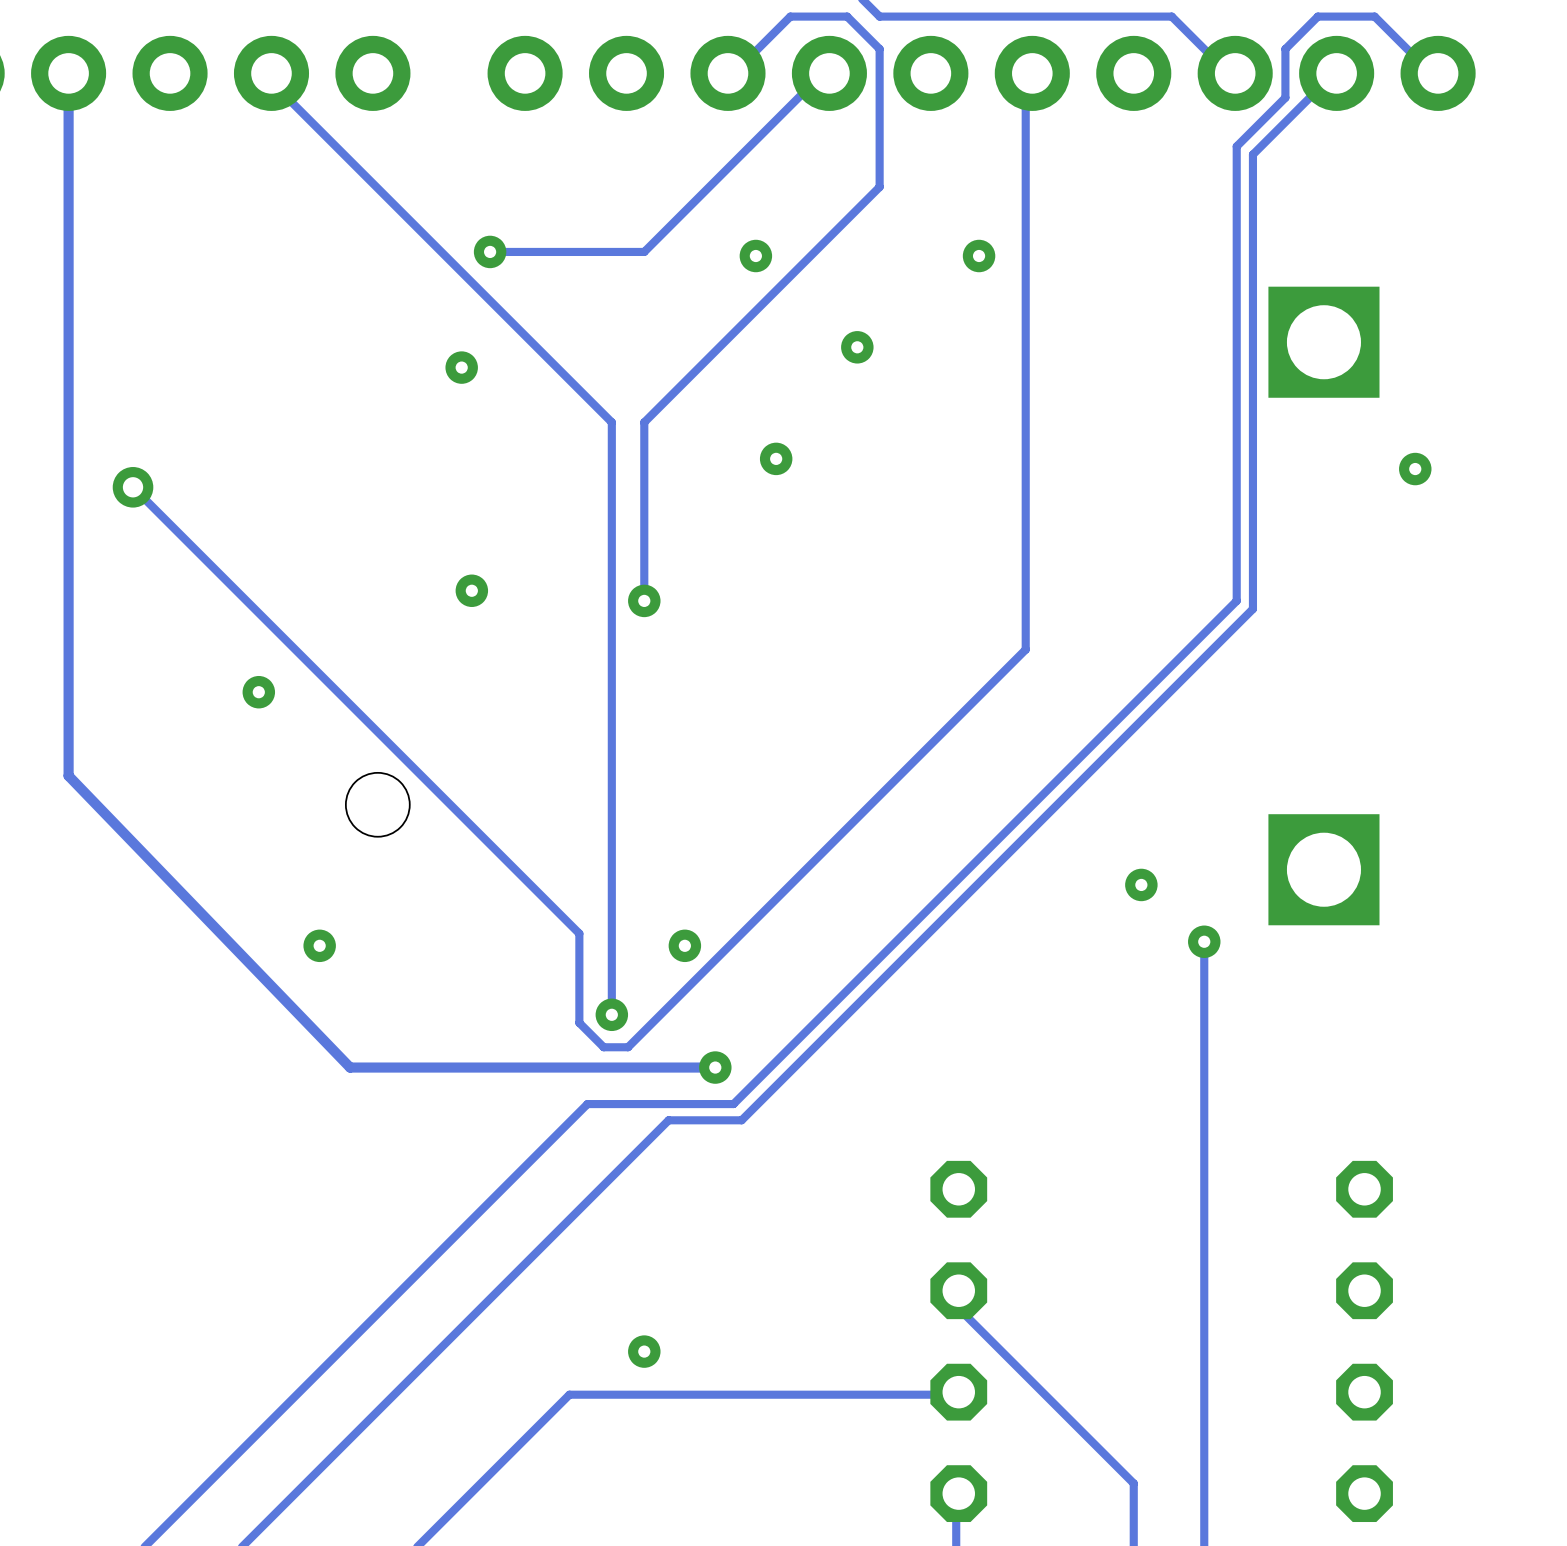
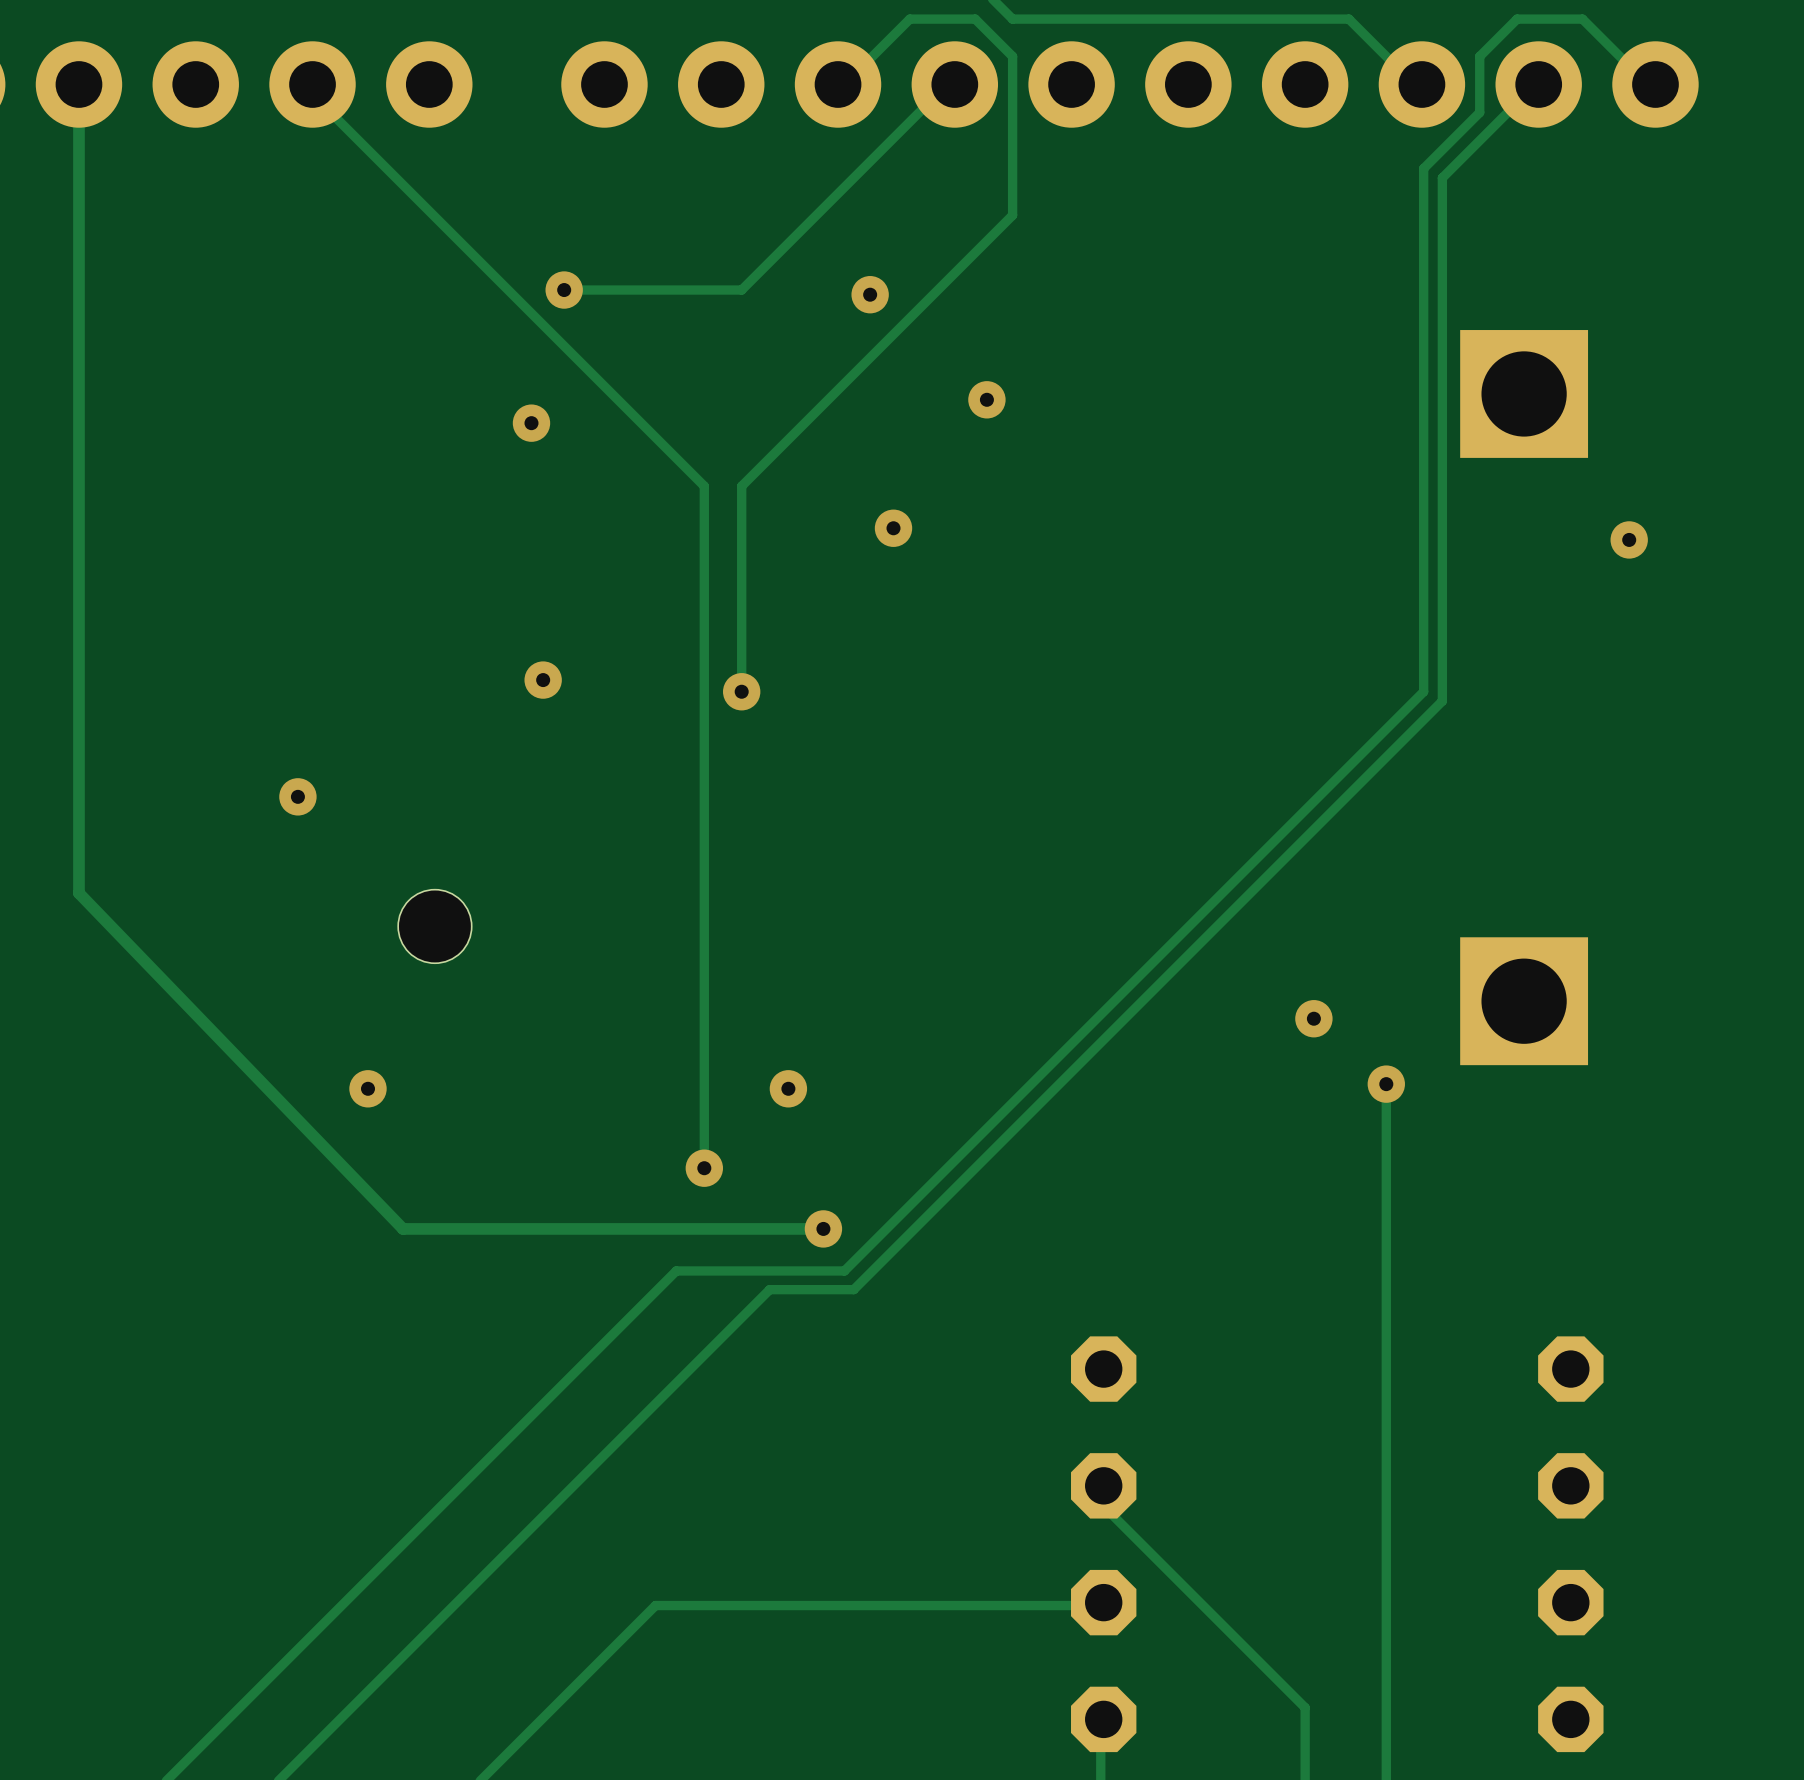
track: (1032, 73) (1025, 73) (1025, 649) (628, 1047) (603, 1047) (579, 1022) (579, 933) (133, 487) -> none
via: (979, 256) -> none
via: (133, 487) -> none
via: (644, 1351) -> none

